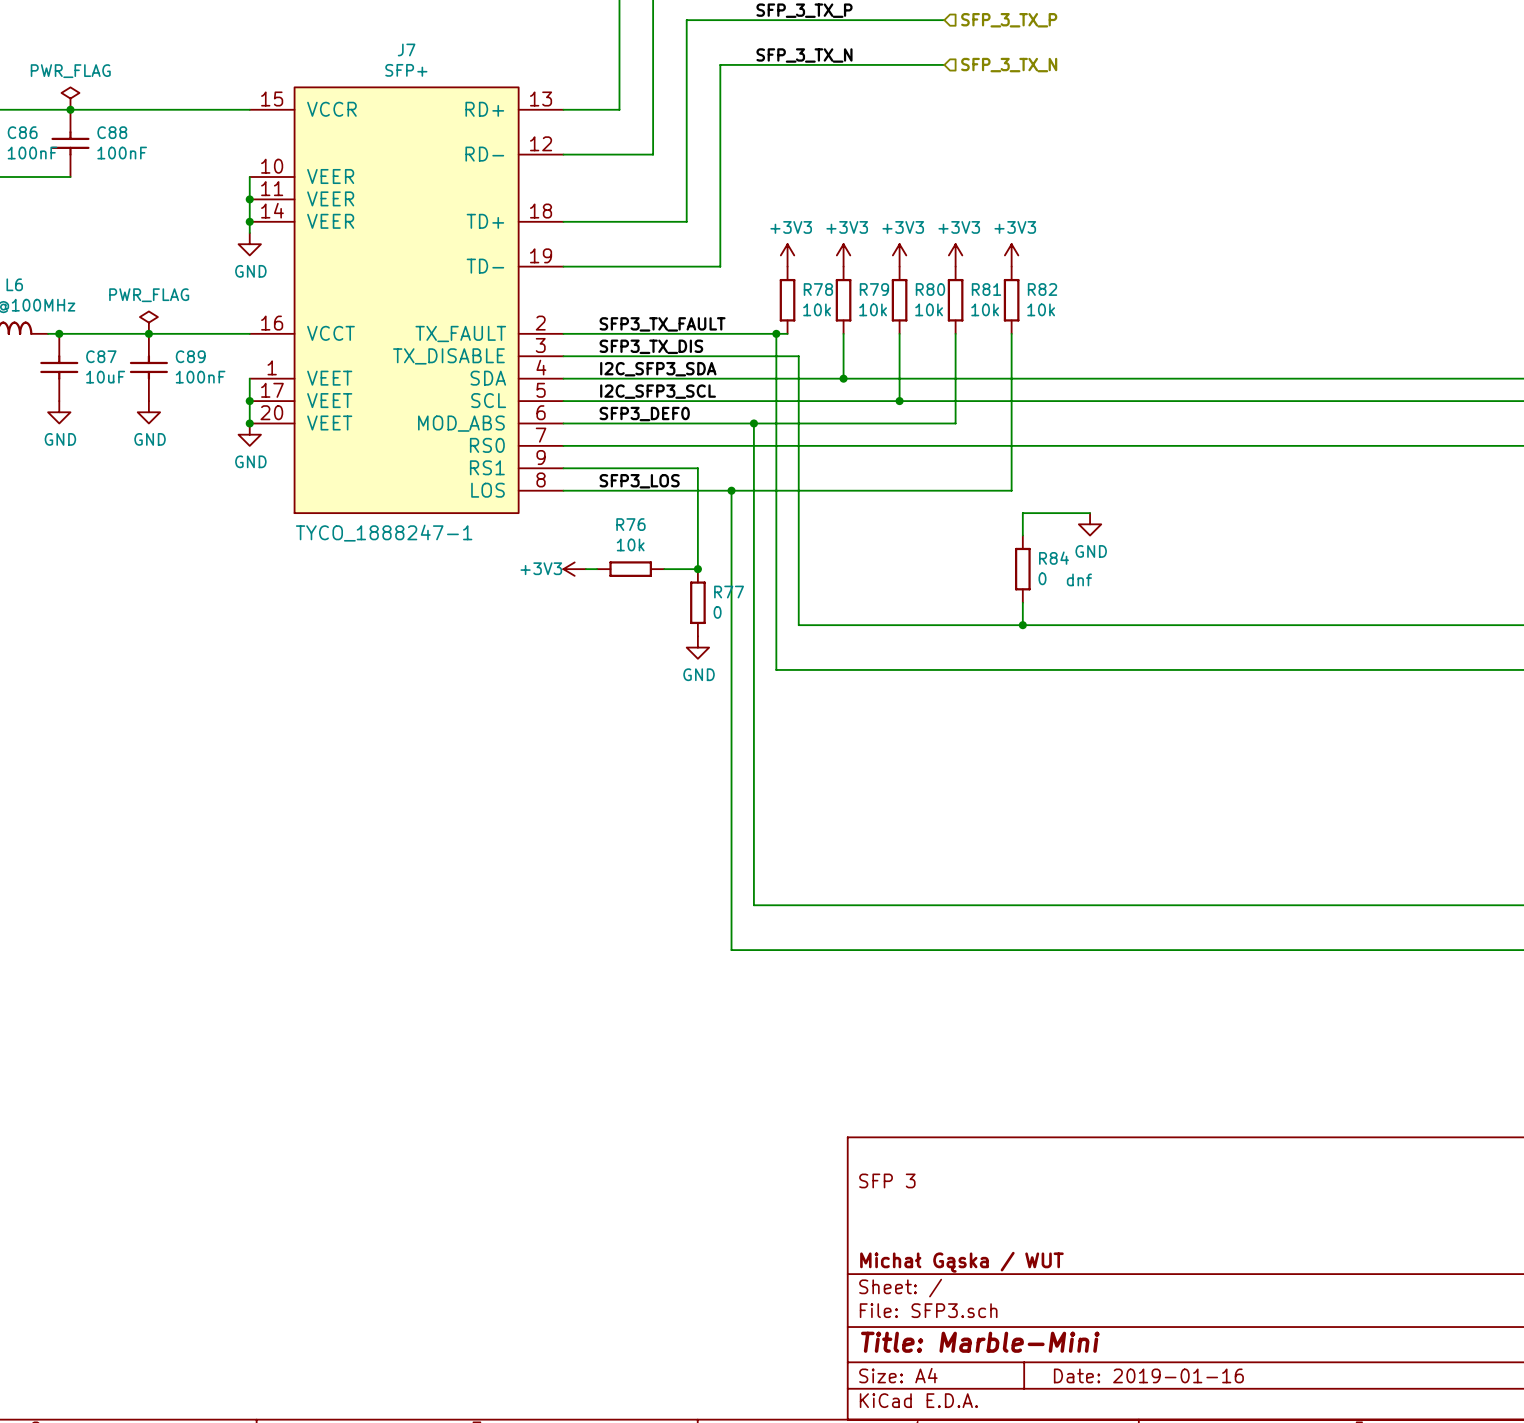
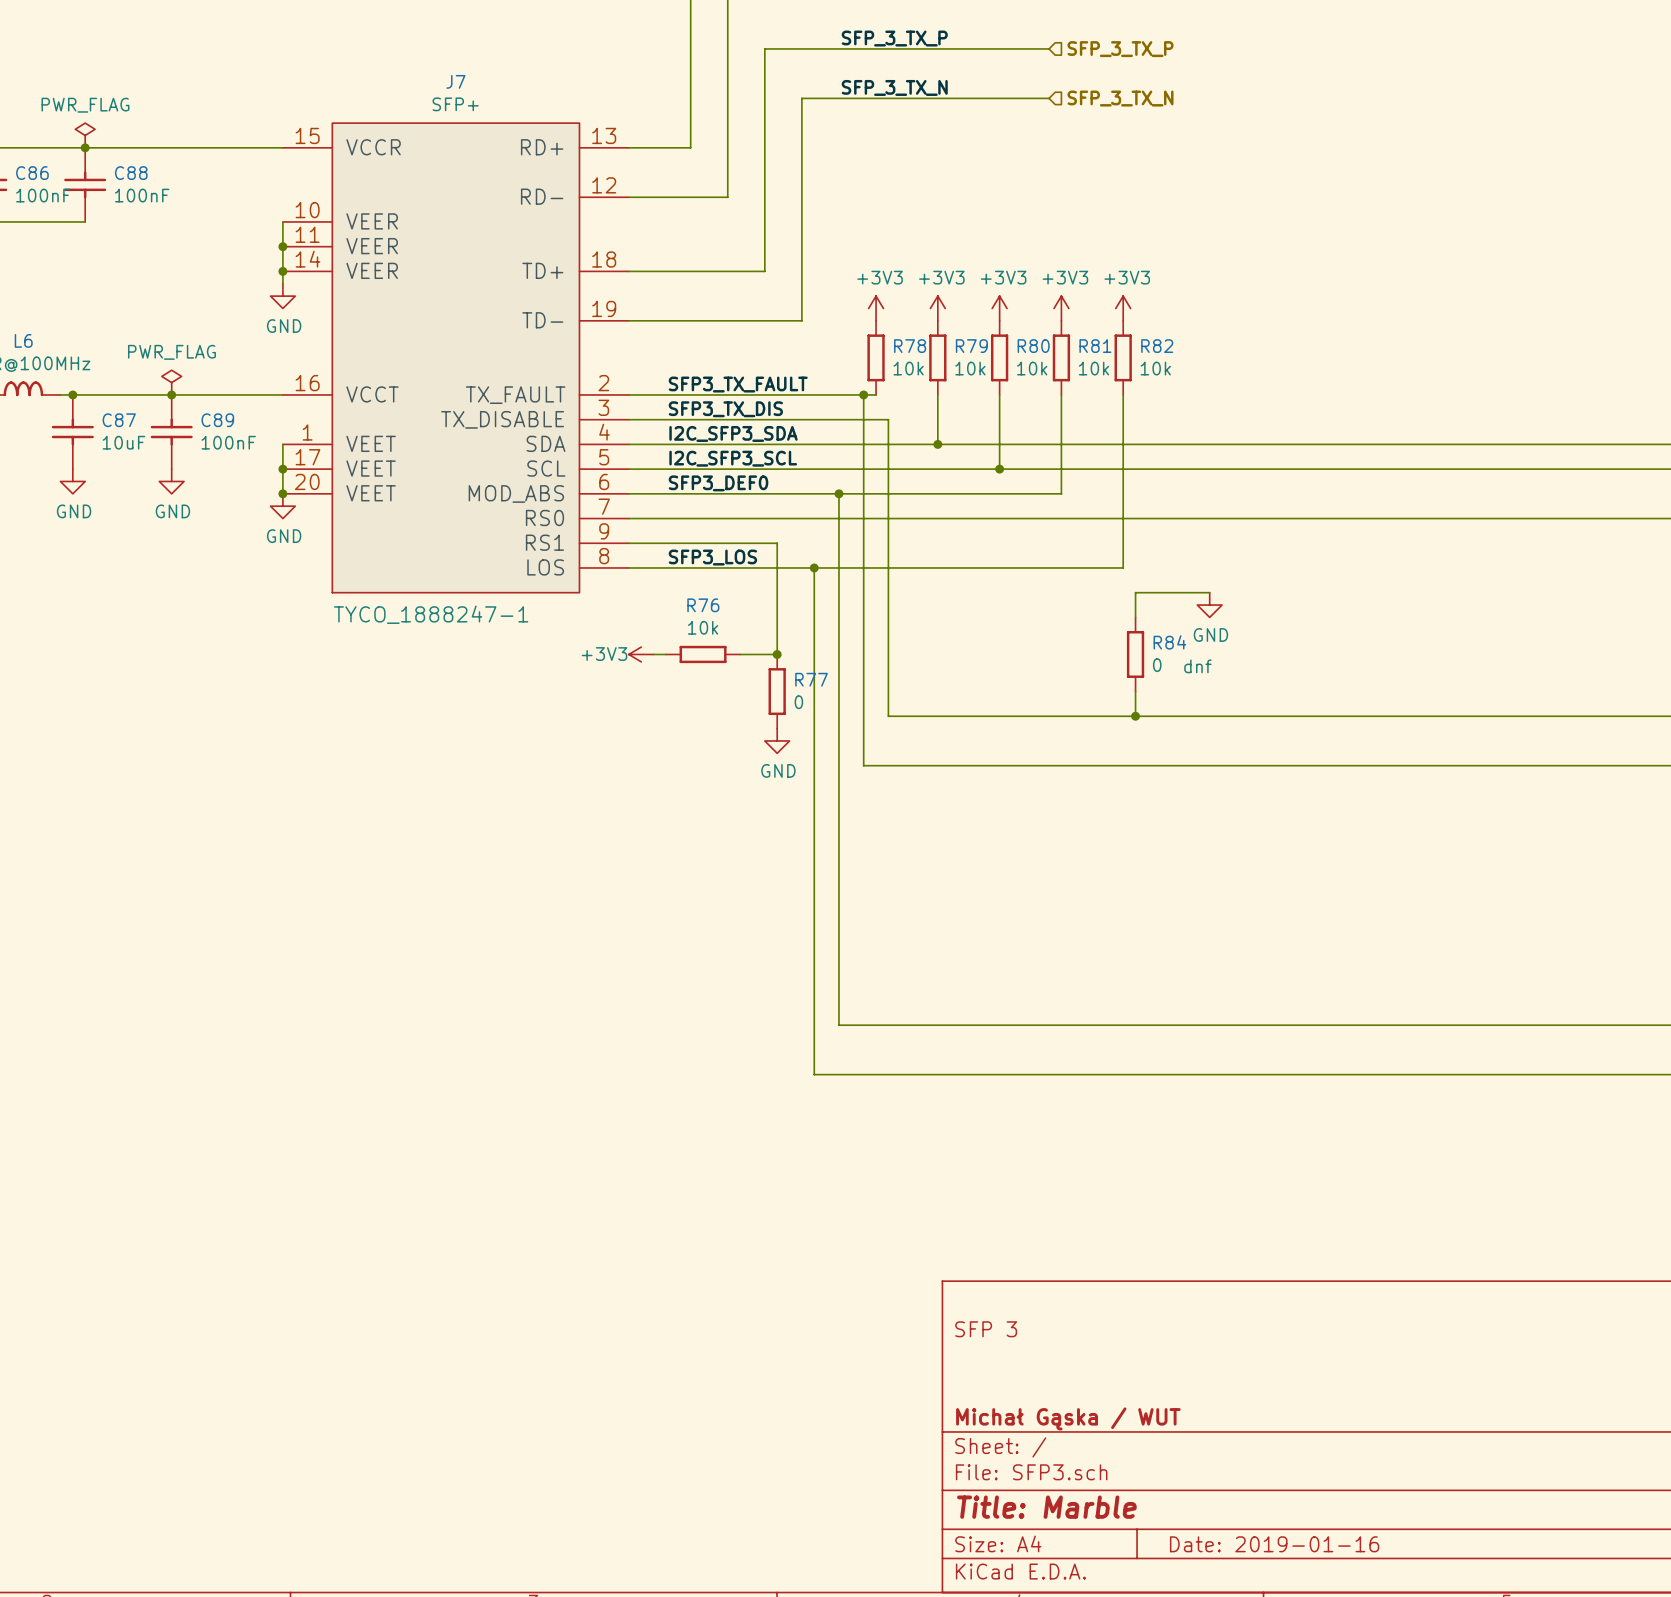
title block: Title: Marble-Mini (980, 1342) -> Title: Marble (1046, 1507)

